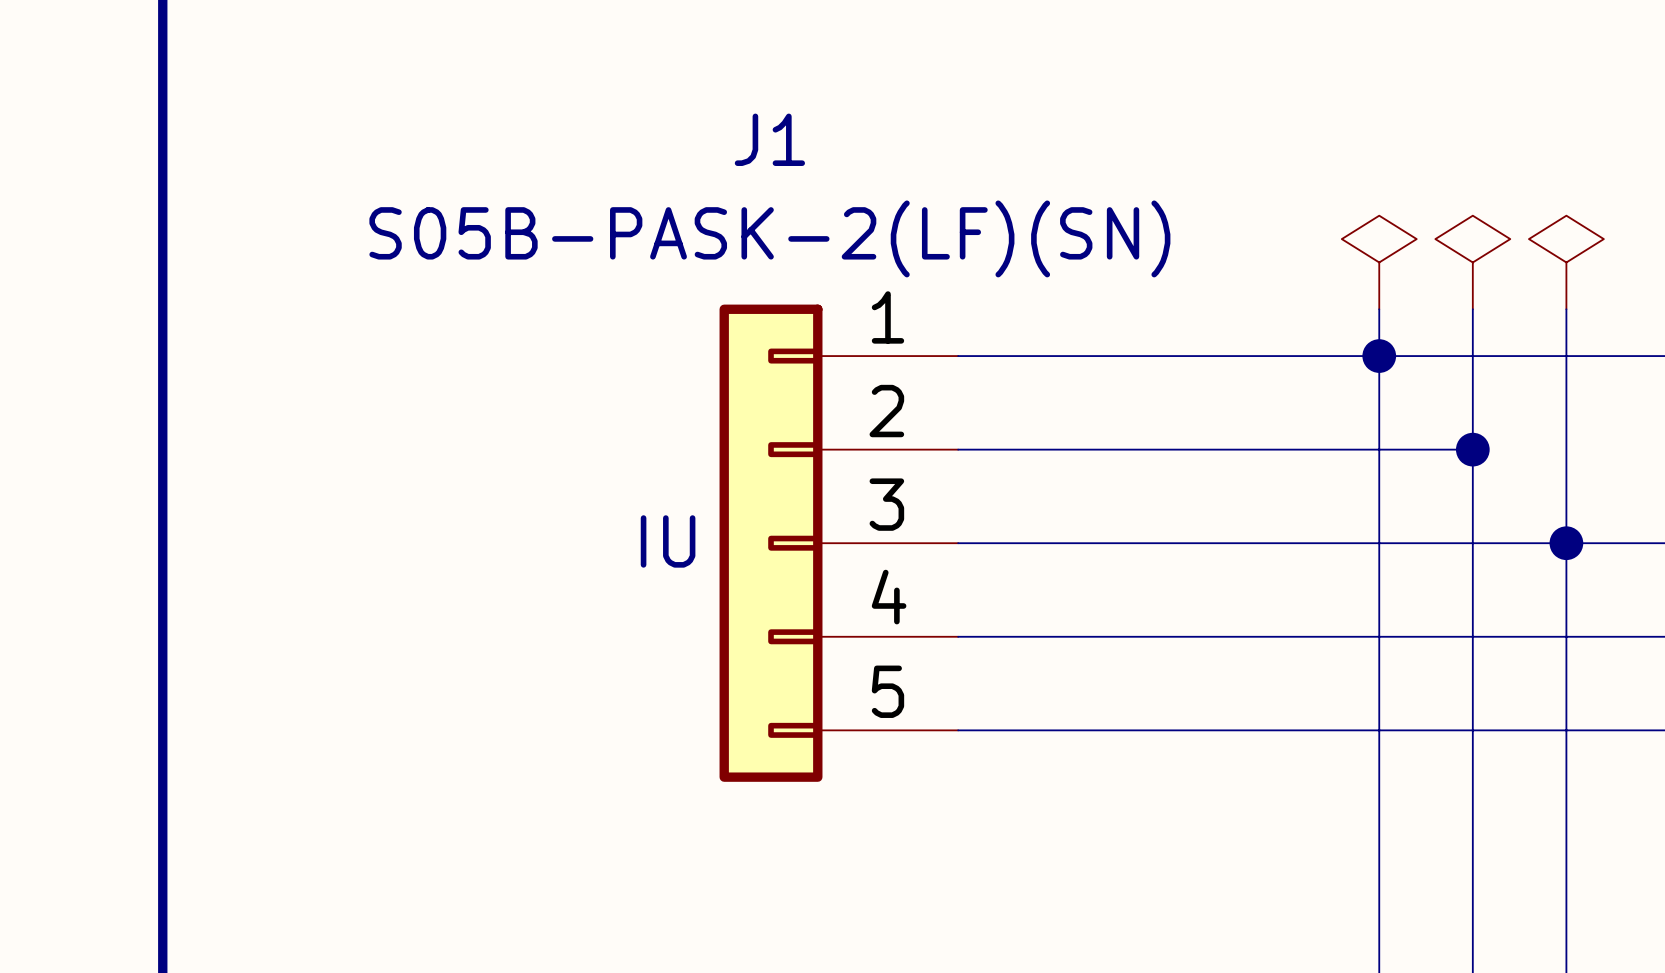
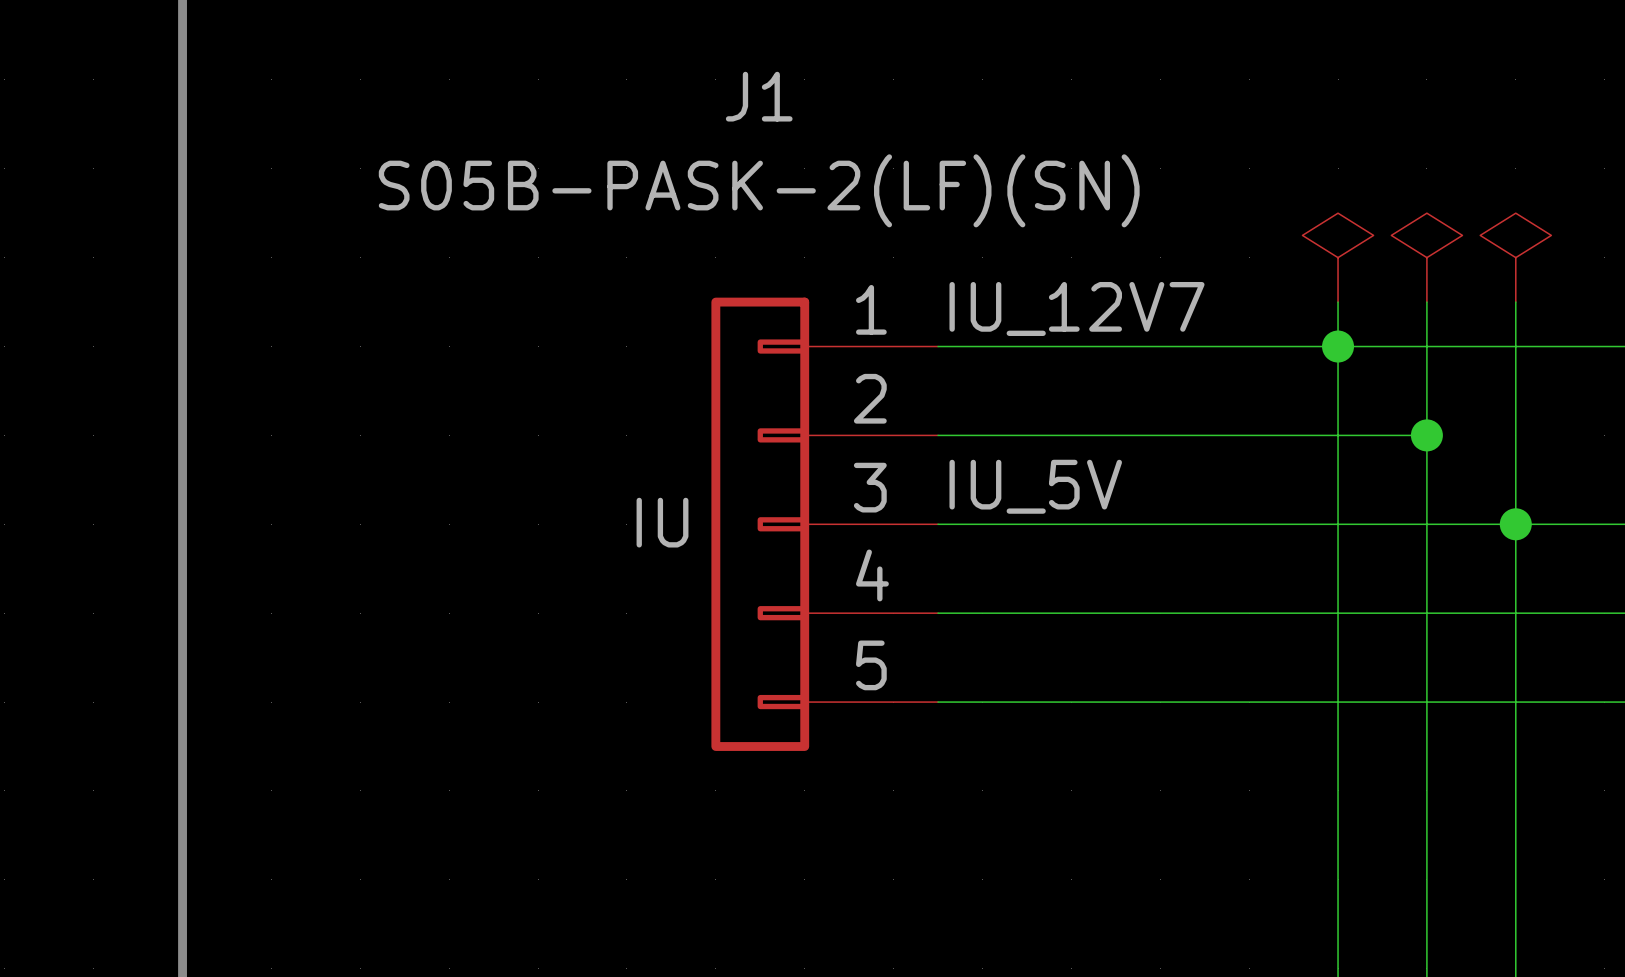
J1 name position: J1 (769, 139) -> J1 (759, 96)
J1 value position: S05B-PASK-2(LF)(SN) (769, 238) -> S05B-PASK-2(LF)(SN) (759, 190)
label: none -> IU_12V7 (1077, 308)
label: none -> IU_5V (1035, 486)

